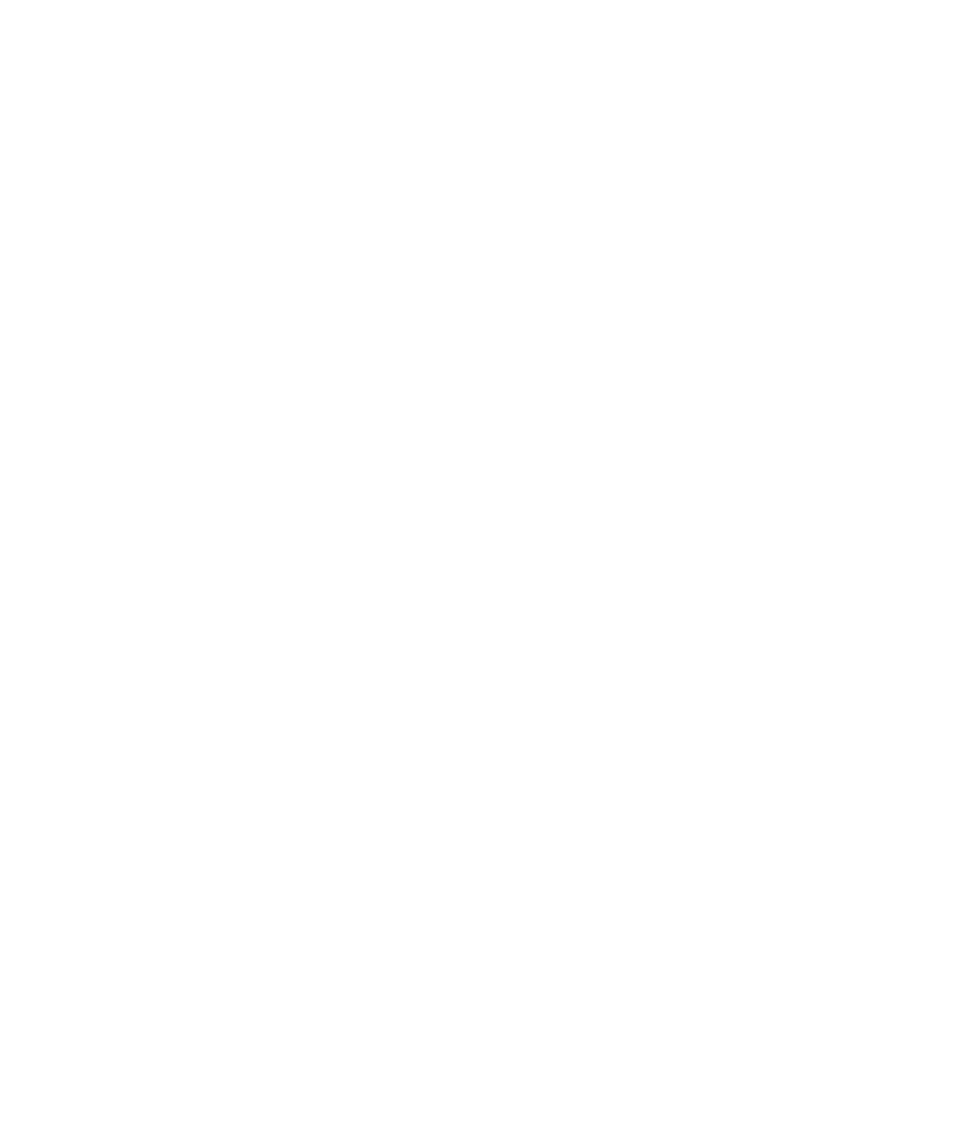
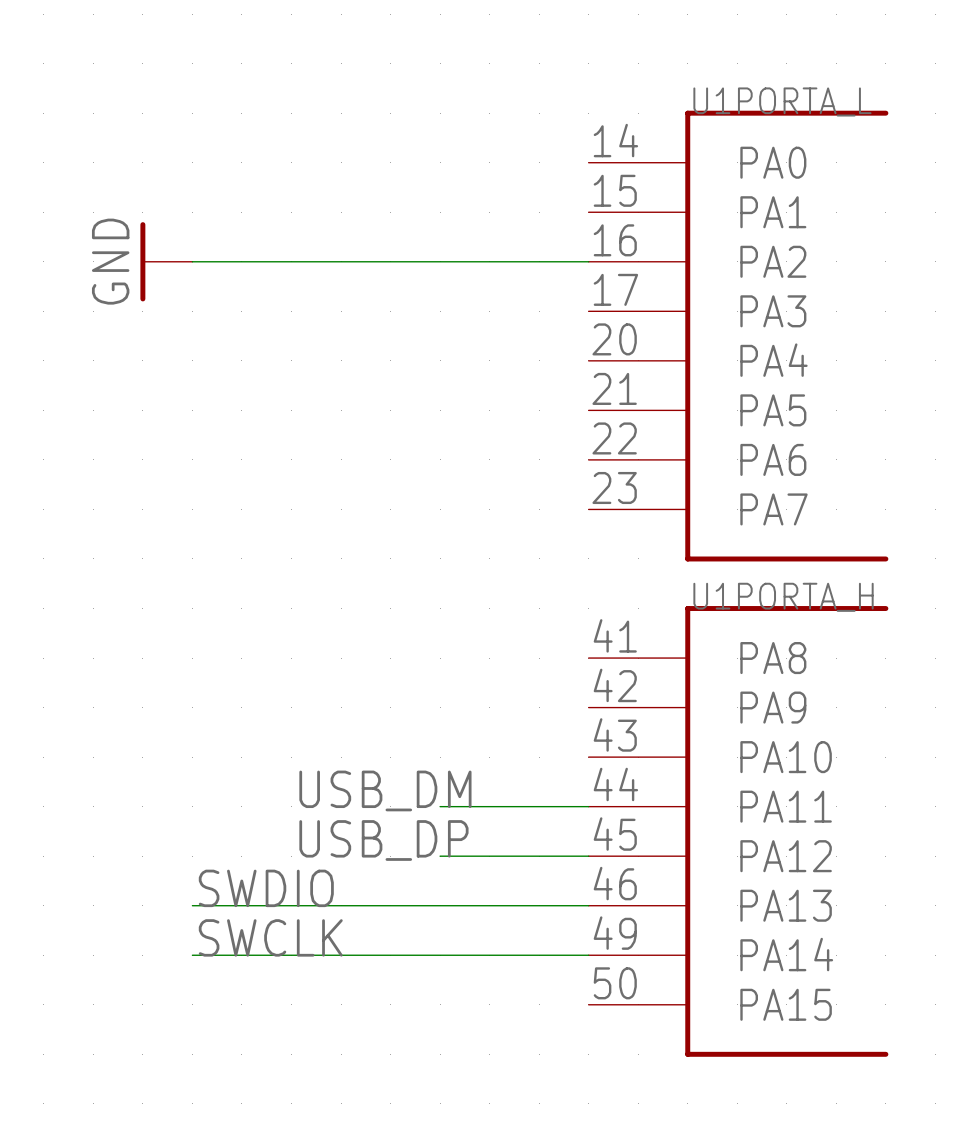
power symbol: none -> GND (166, 261)
wire: none -> (192, 261) (588, 261)
U1PORTA_L: none -> (738, 336)
label: none -> USB_DM (385, 790)
wire: none -> (440, 806) (588, 806)
U1PORTA_H: none -> (738, 831)
label: none -> USB_DP (383, 840)
wire: none -> (440, 856) (588, 856)
label: none -> SWDIO (266, 888)
wire: none -> (192, 905) (588, 905)
label: none -> SWCLK (270, 937)
wire: none -> (192, 955) (588, 955)

